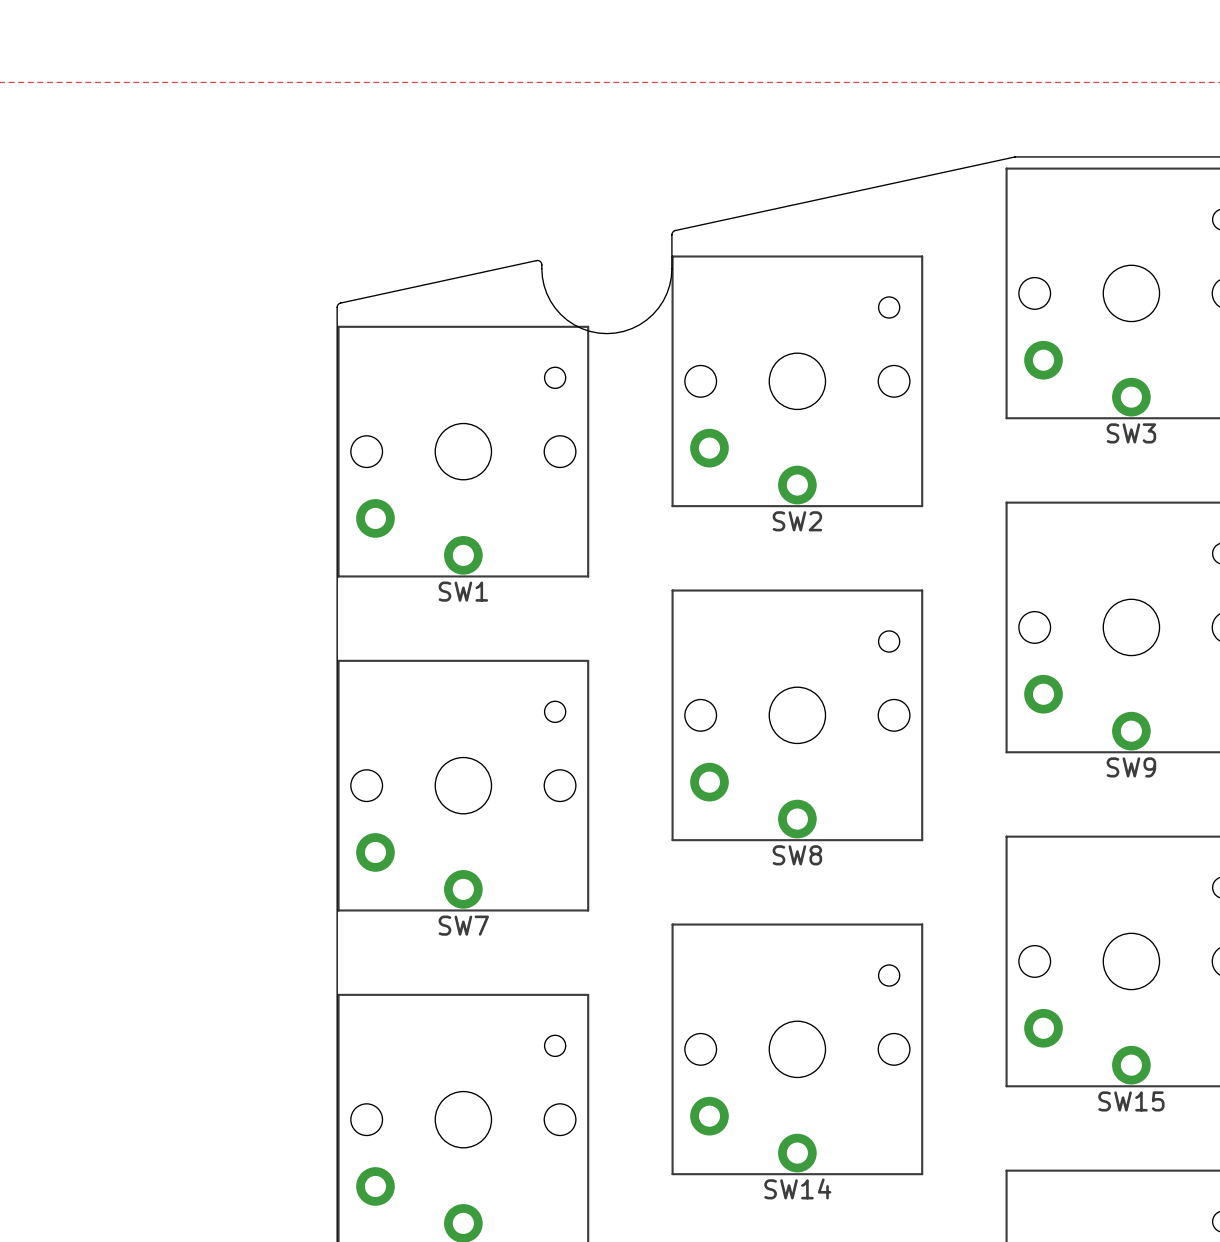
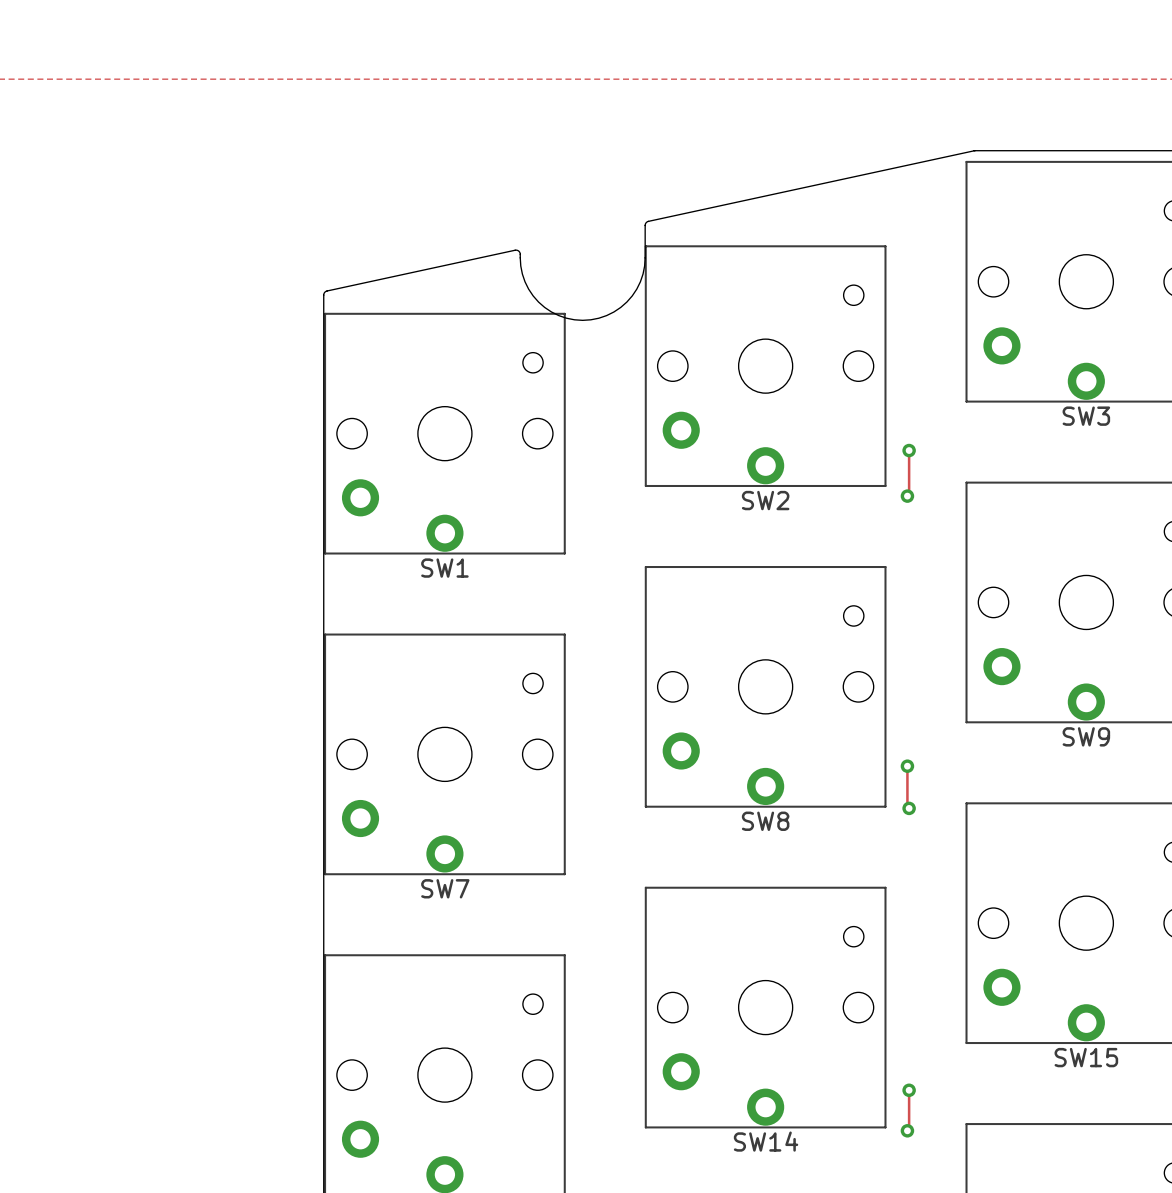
track: none -> (909, 450) (909, 494) (907, 496)
via: none -> (909, 450)
via: none -> (907, 496)
track: none -> (907, 766) (907, 806) (909, 808)
via: none -> (907, 766)
via: none -> (909, 808)
track: none -> (909, 1090) (909, 1129) (907, 1130)
via: none -> (909, 1090)
via: none -> (907, 1130)

